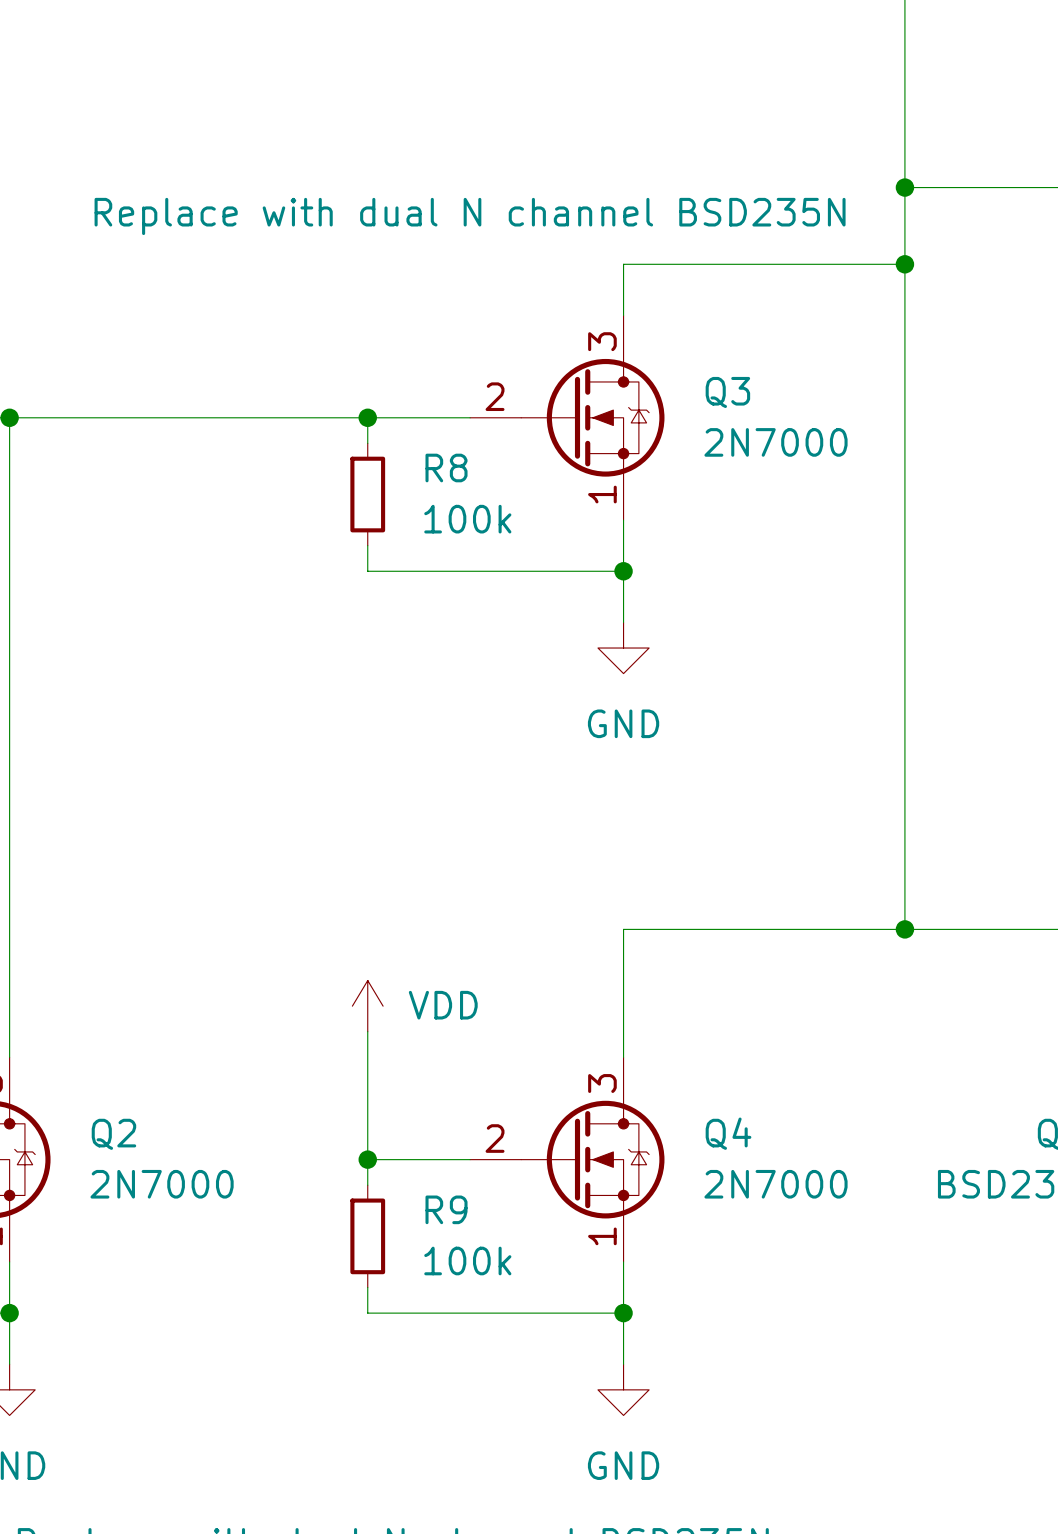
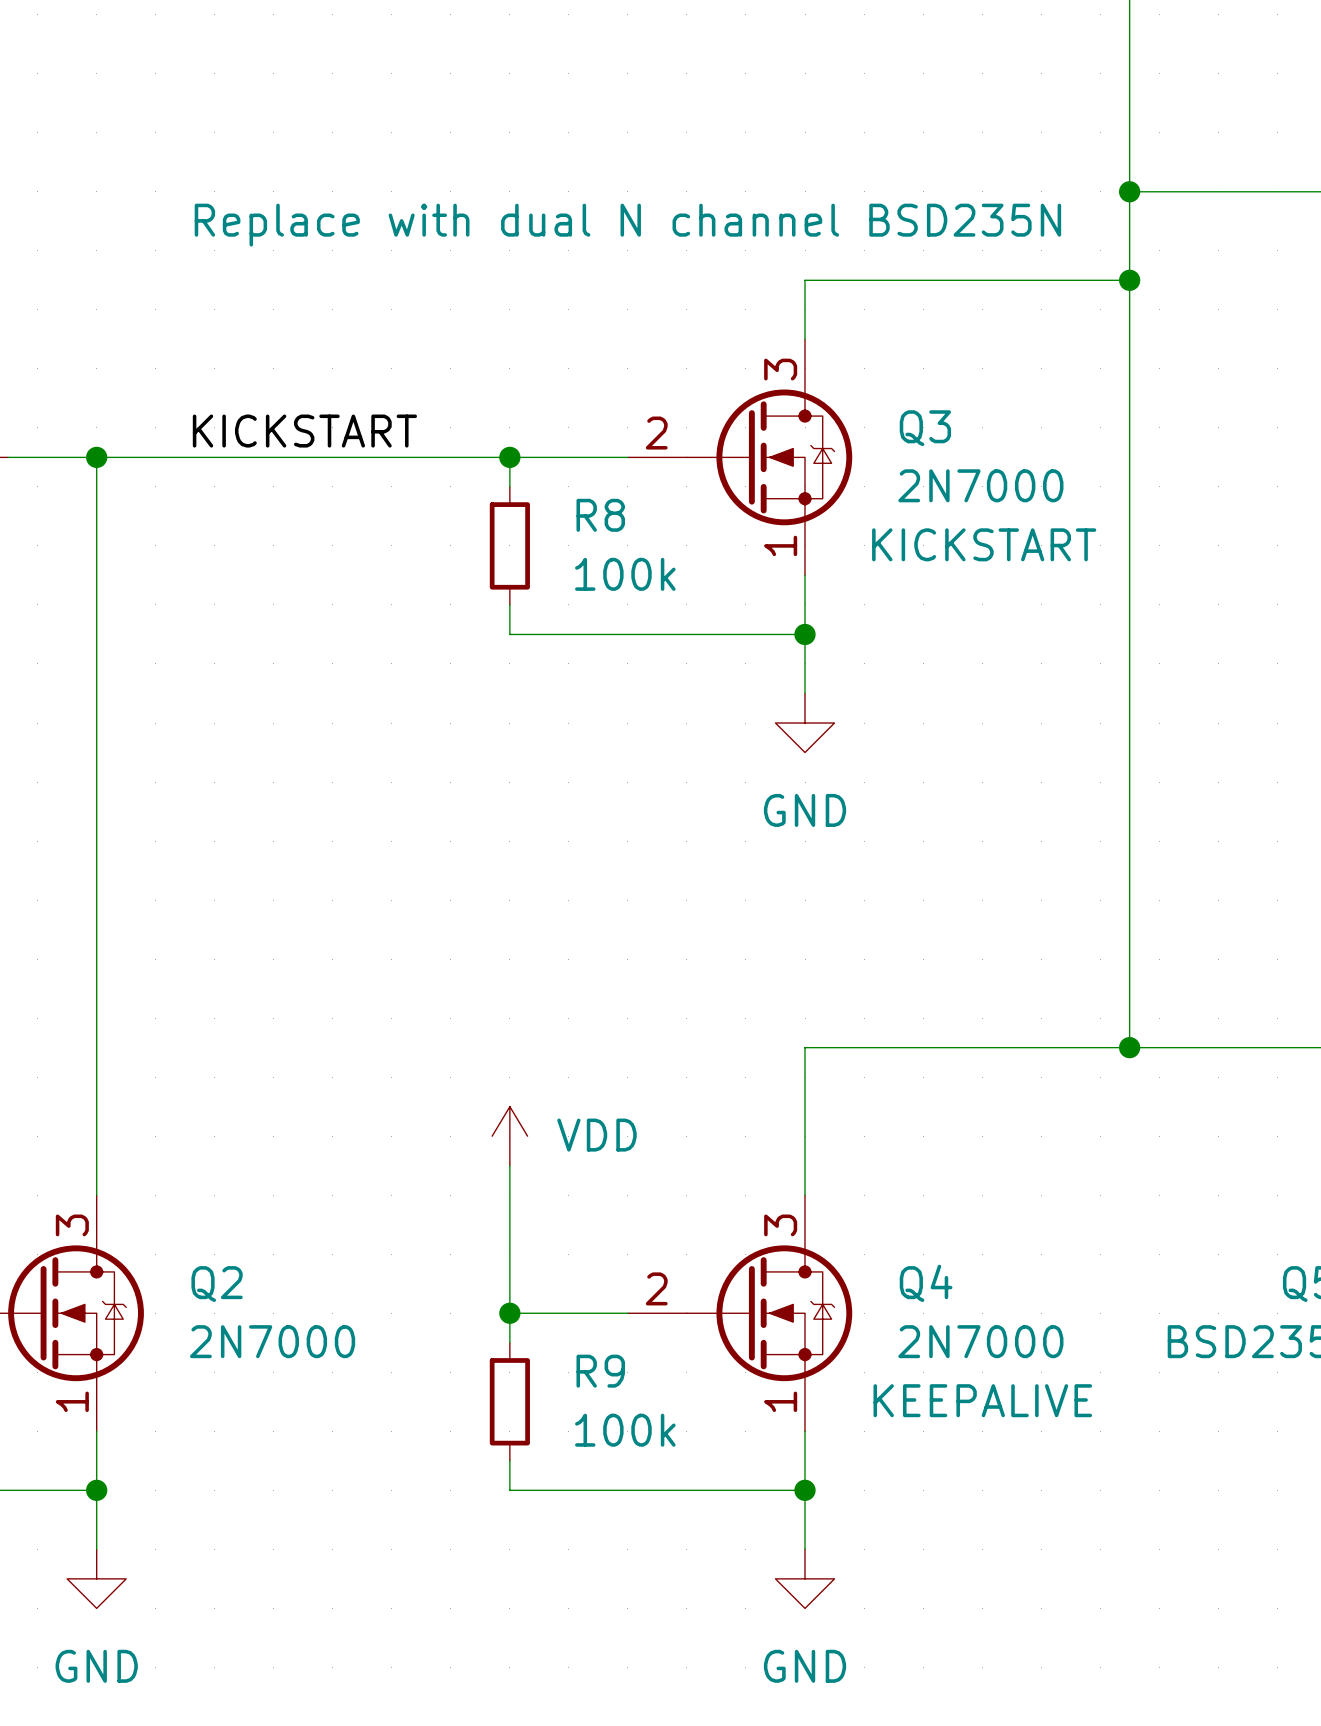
label: none -> KICKSTART (304, 431)
Q3 text: none -> KICKSTART (984, 544)
Q4 text: none -> KEEPALIVE (982, 1400)

